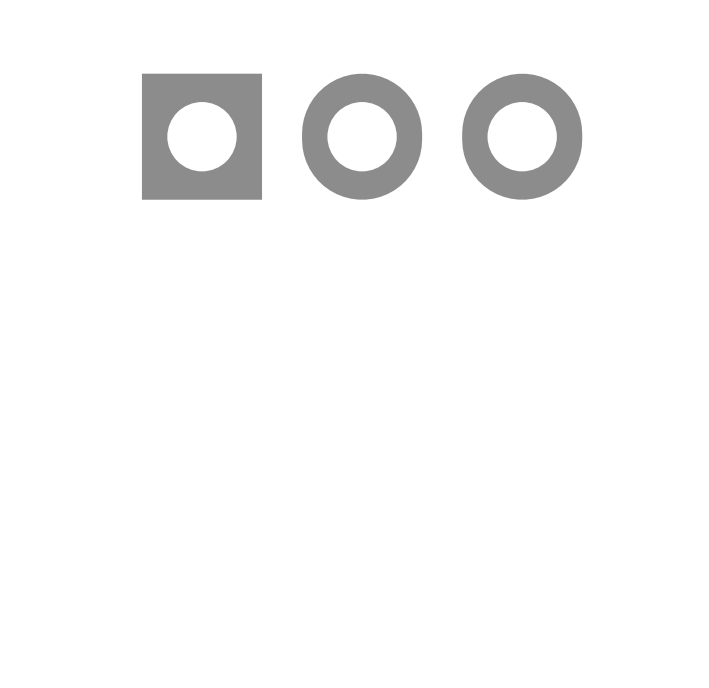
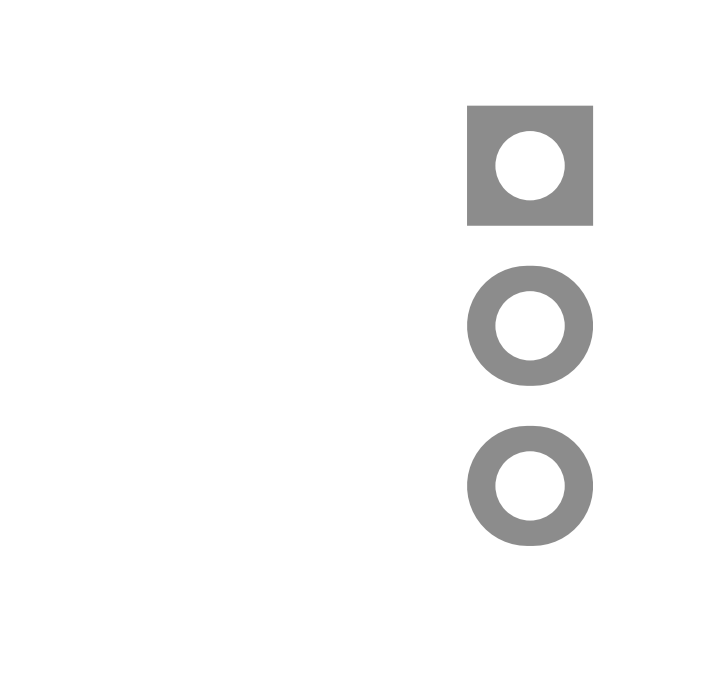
part rotation: 0° (362, 136) -> 90° clockwise (530, 325)

